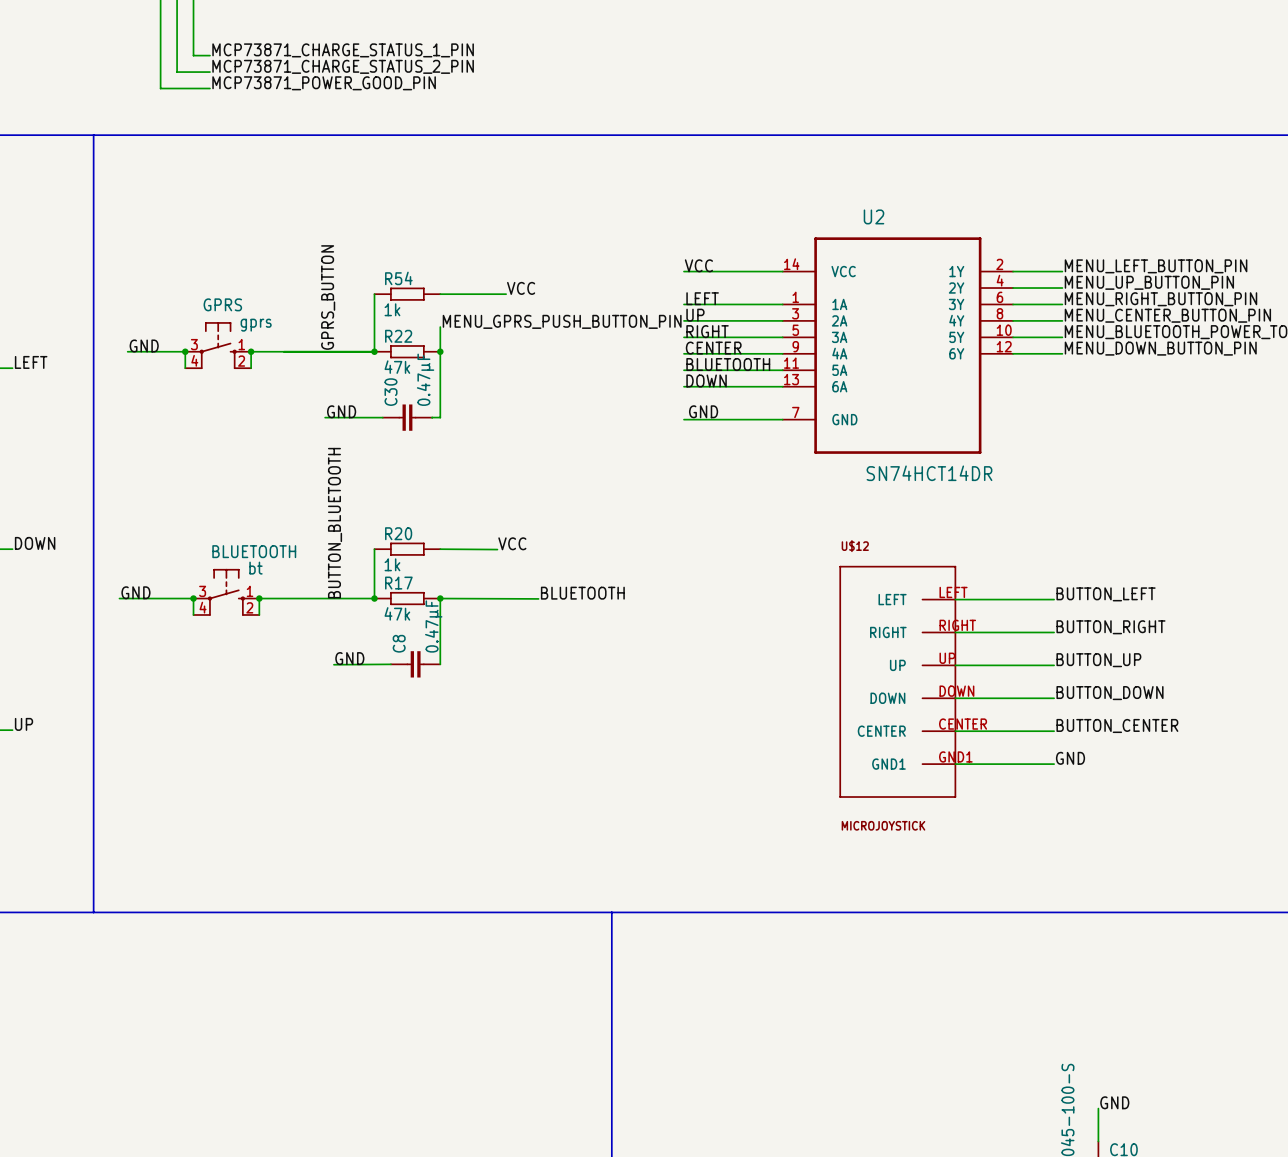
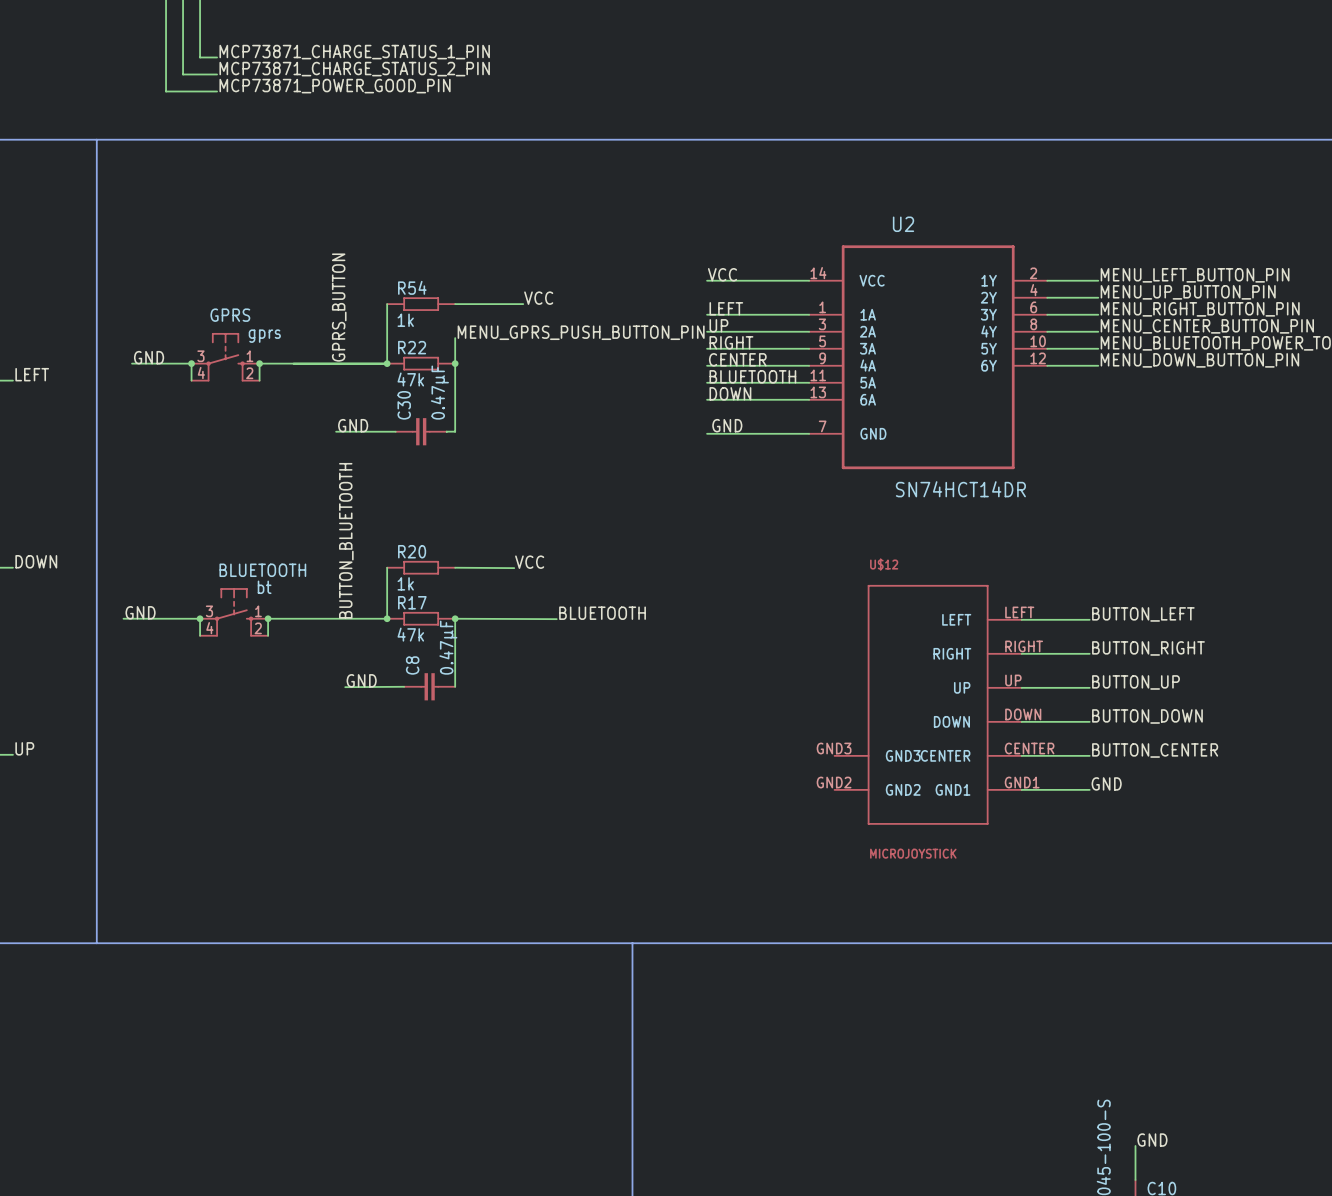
U$12 symbol: [839, 565, 957, 798] -> [834, 584, 1022, 825]

